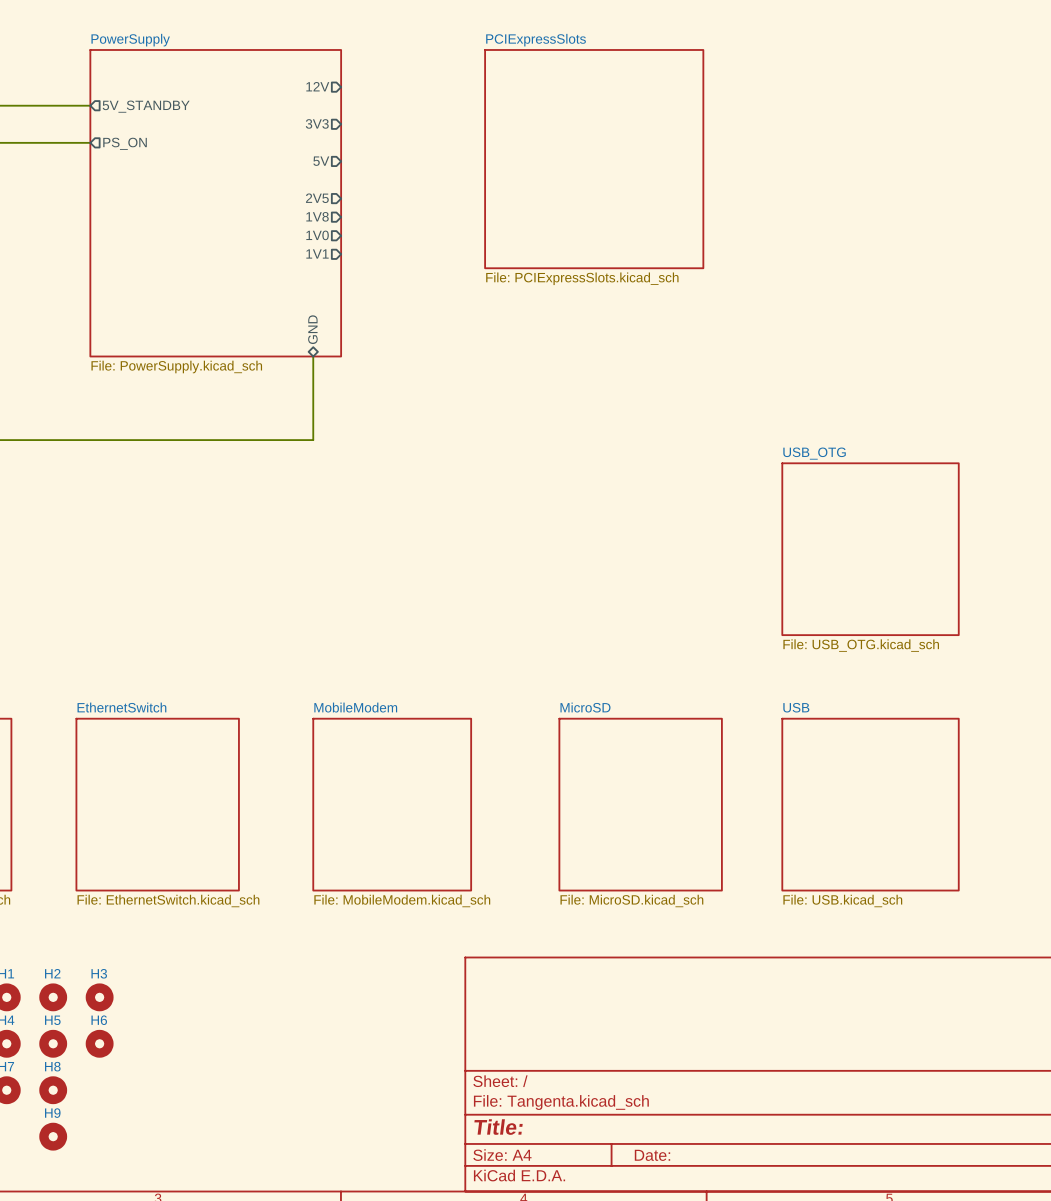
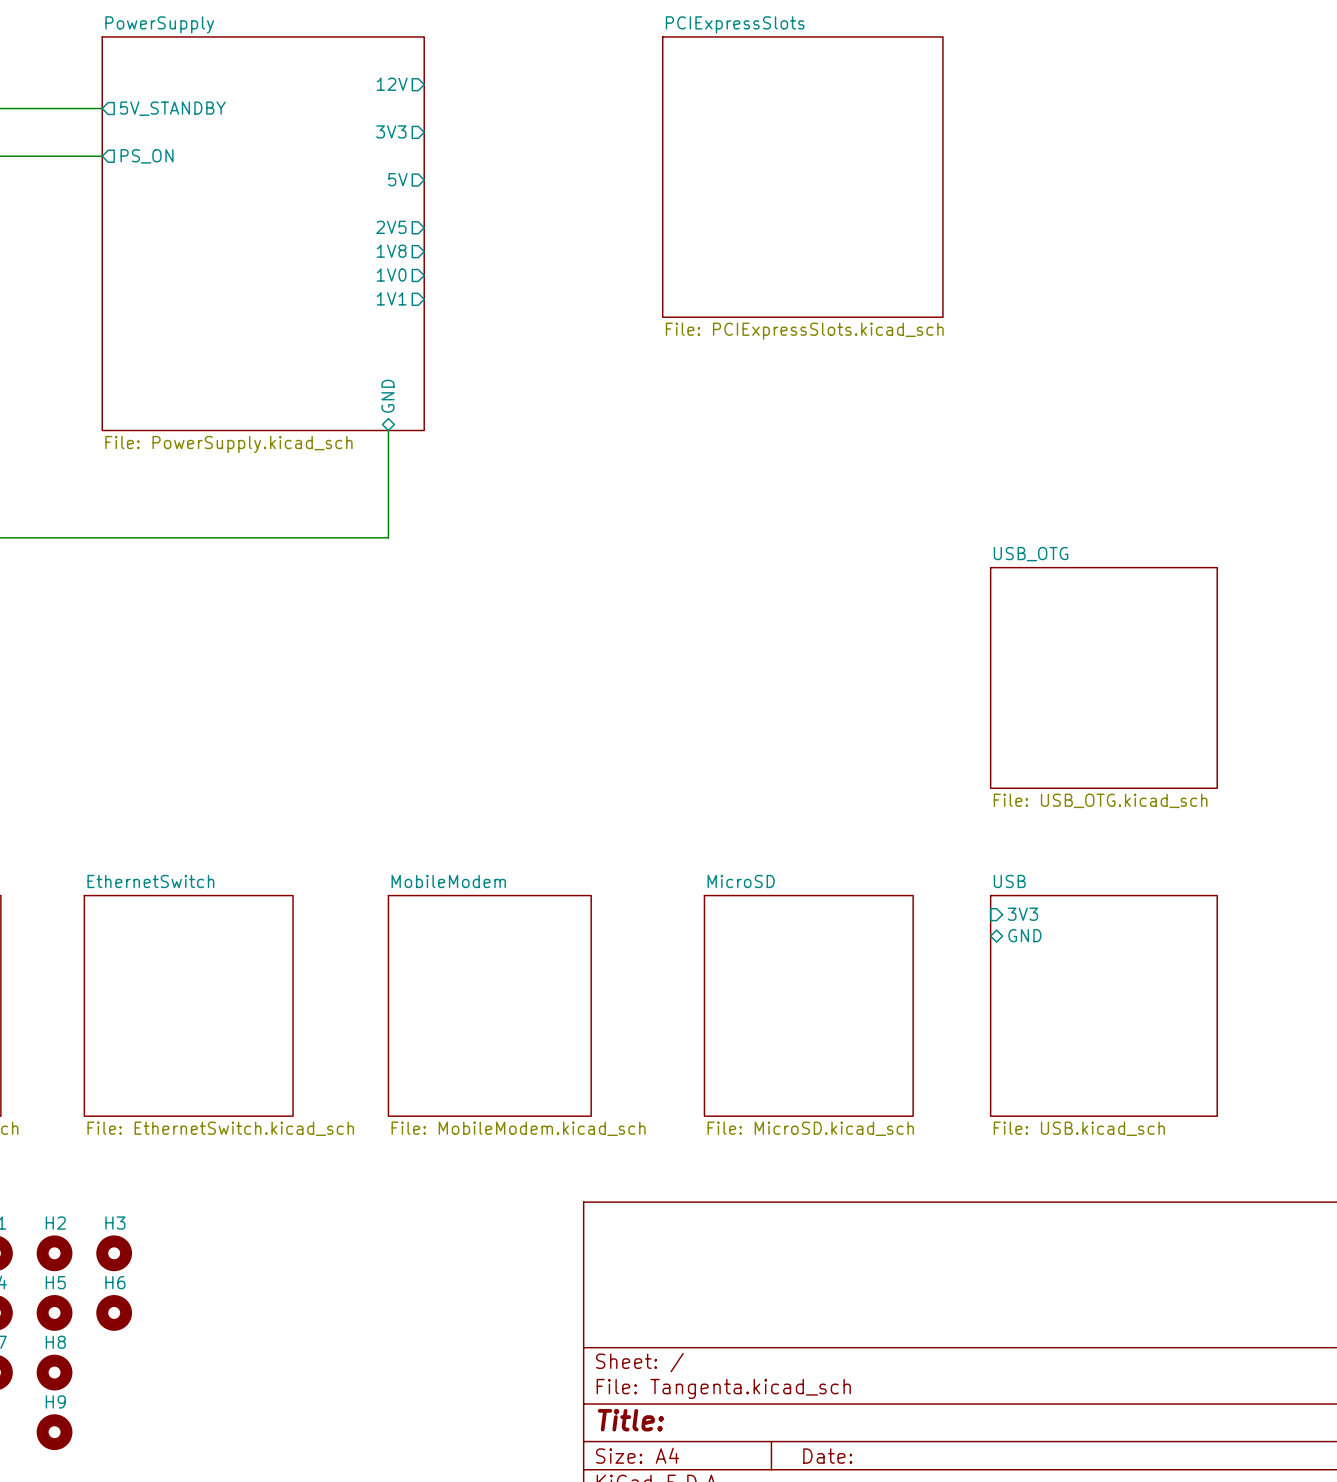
sheet PCIExpressSlots position: (594, 159) -> (802, 177)
sheet pin: none -> 3V3 (1022, 914)
sheet pin: none -> GND (1024, 935)

